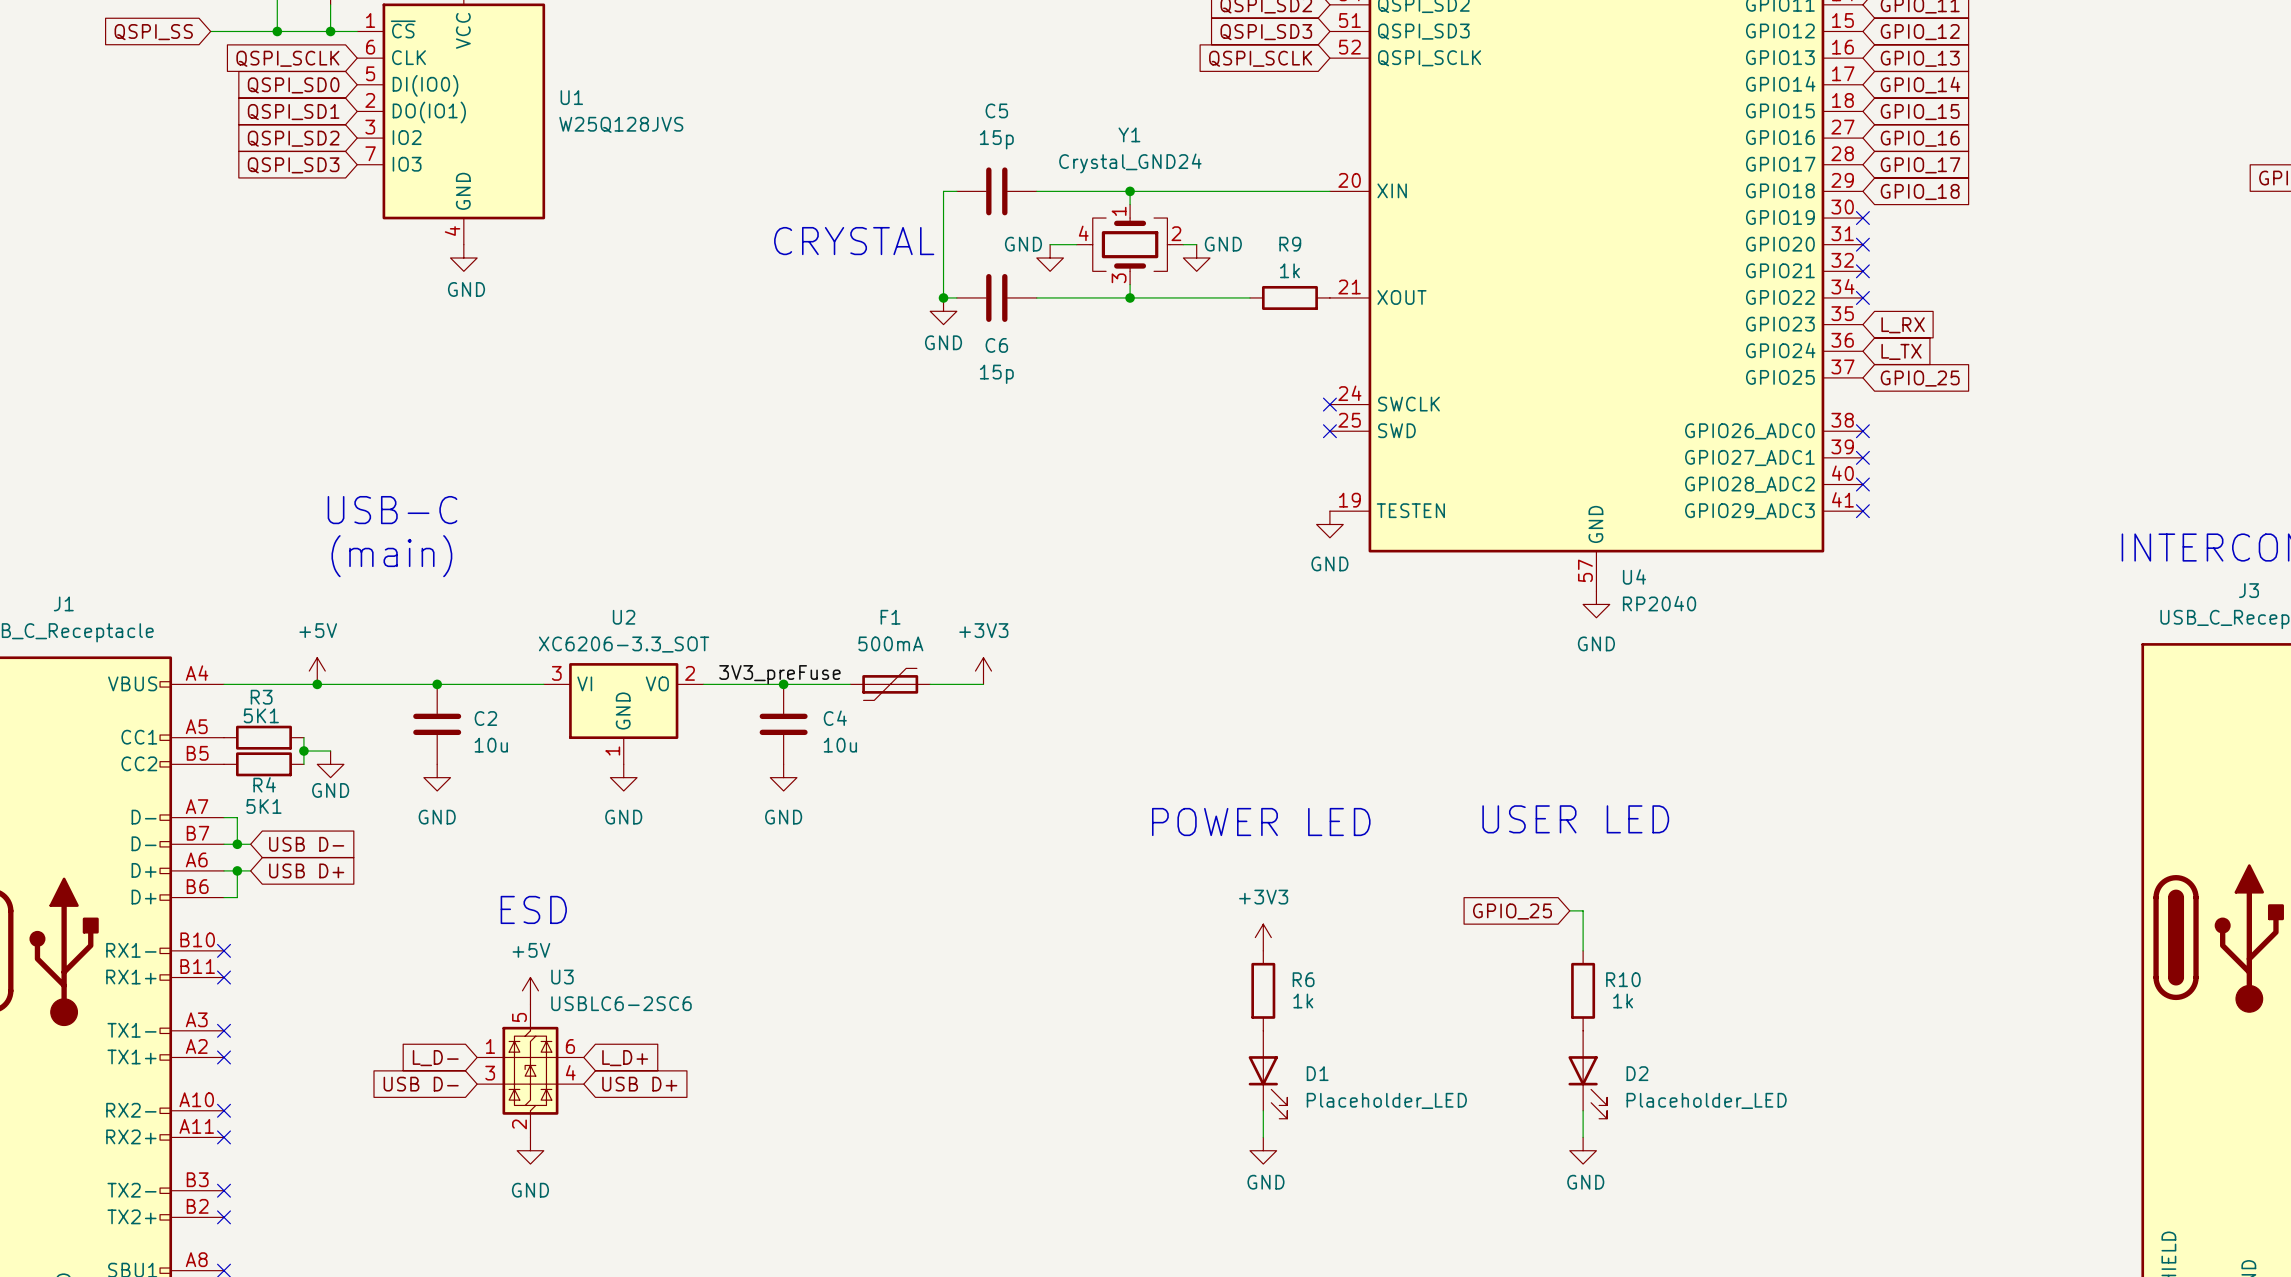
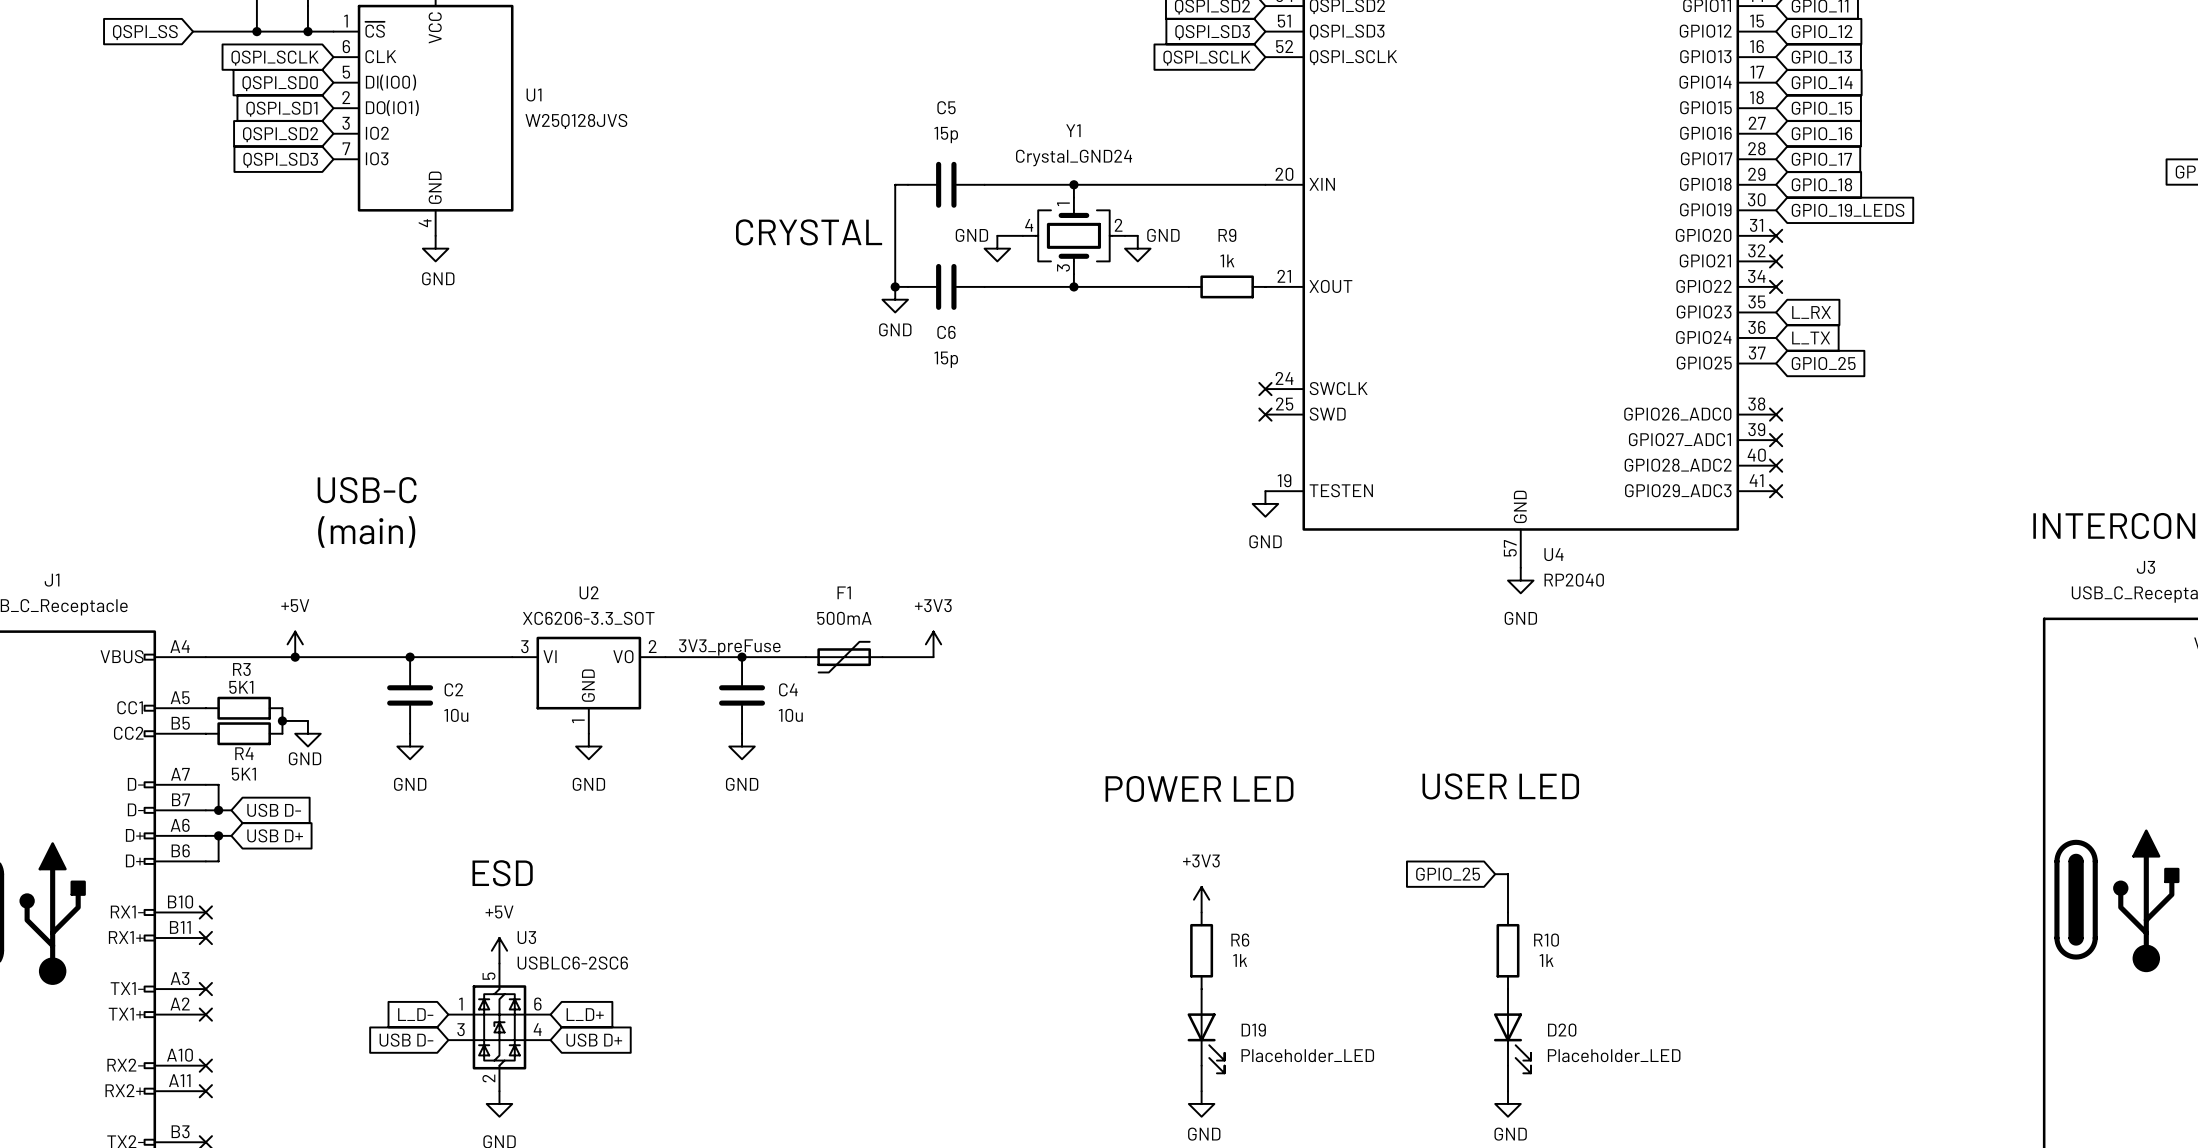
no-connect mark: (1862, 218) -> none
global label: none -> GPIO_19_LEDS (1848, 210)
D1 name: D1 (1317, 1073) -> D19 (1253, 1030)
D2 name: D2 (1637, 1073) -> D20 (1562, 1030)

